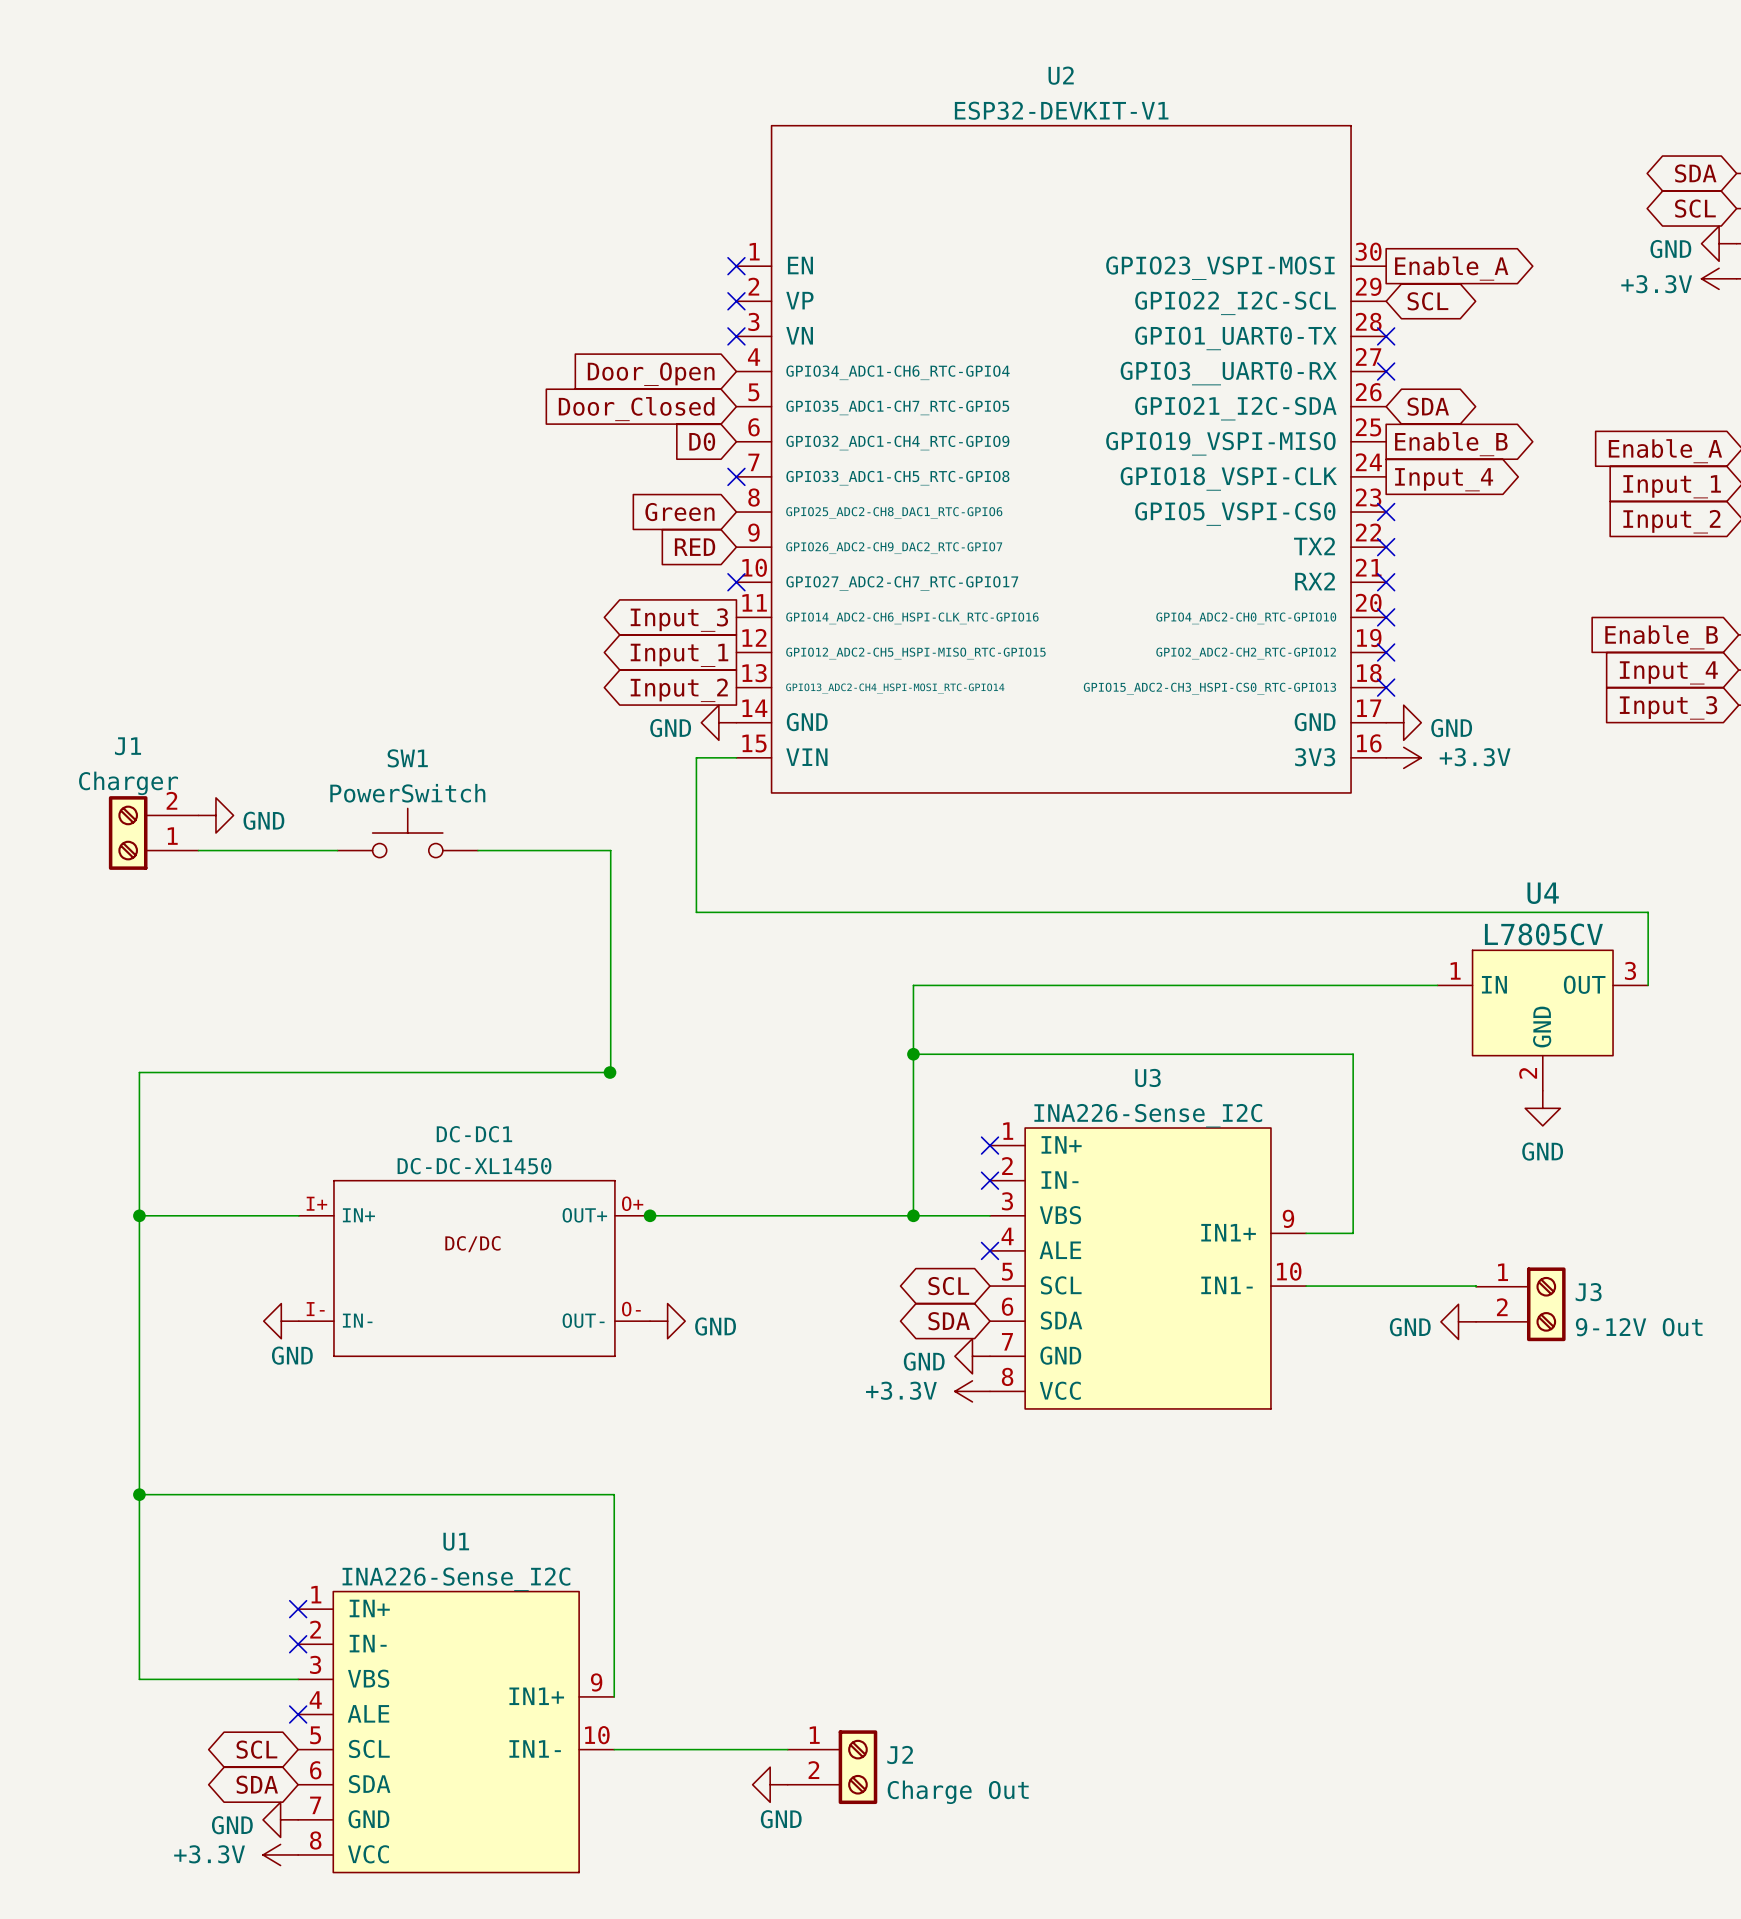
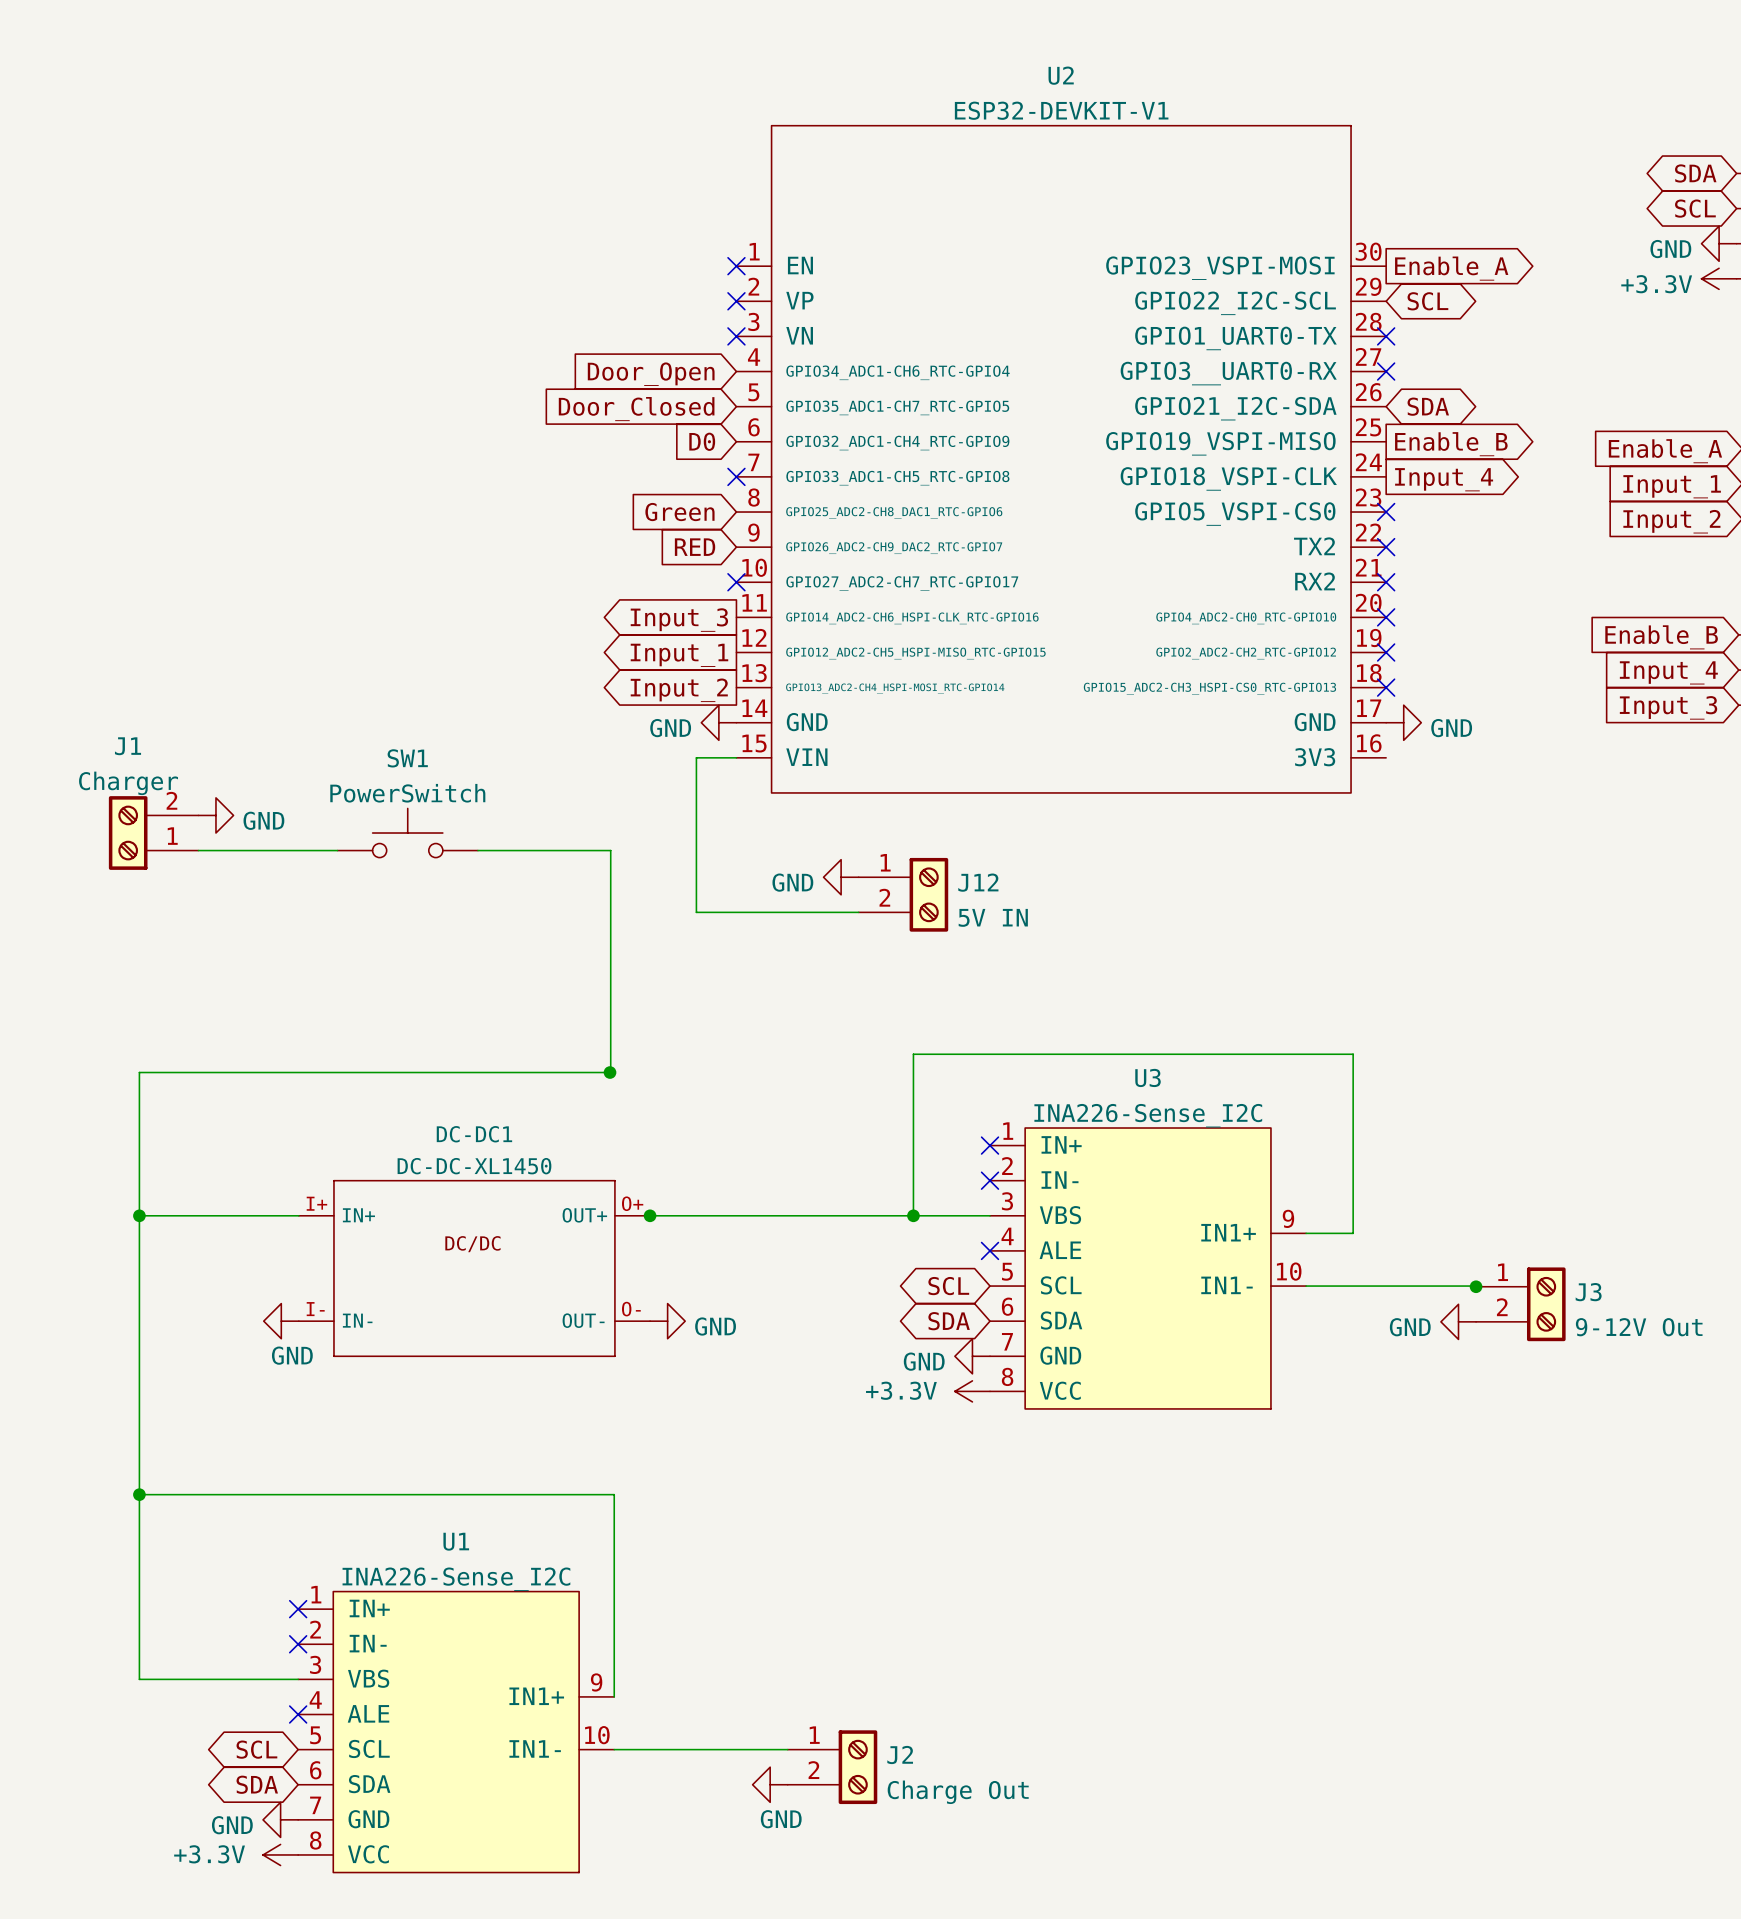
power symbol: +3.3V (1403, 757) -> none
power symbol: none -> GND (841, 877)
J12: none -> 5V IN (903, 894)
wire: (858, 912) (1648, 912) (1648, 985) -> none
wire: (1437, 985) (913, 985) (913, 1054) -> none
U4: L7805CV (1542, 1020) -> none
junction: (913, 1054) -> none
power symbol: GND (1542, 1108) -> none
junction: none -> (1476, 1286)

